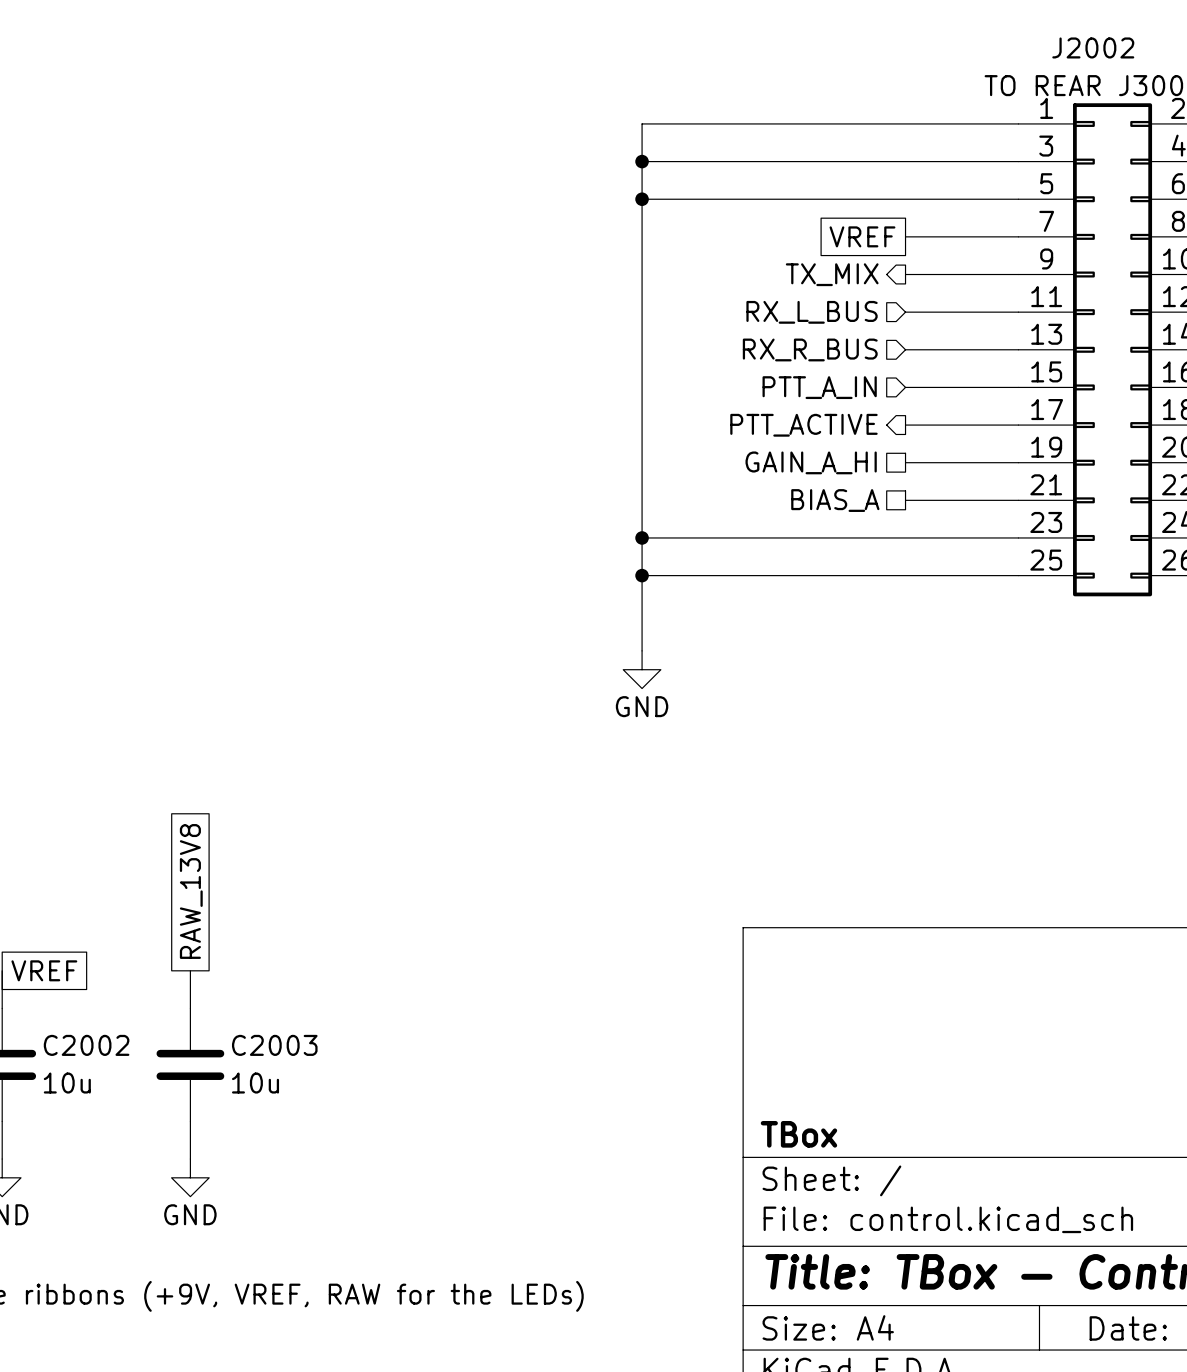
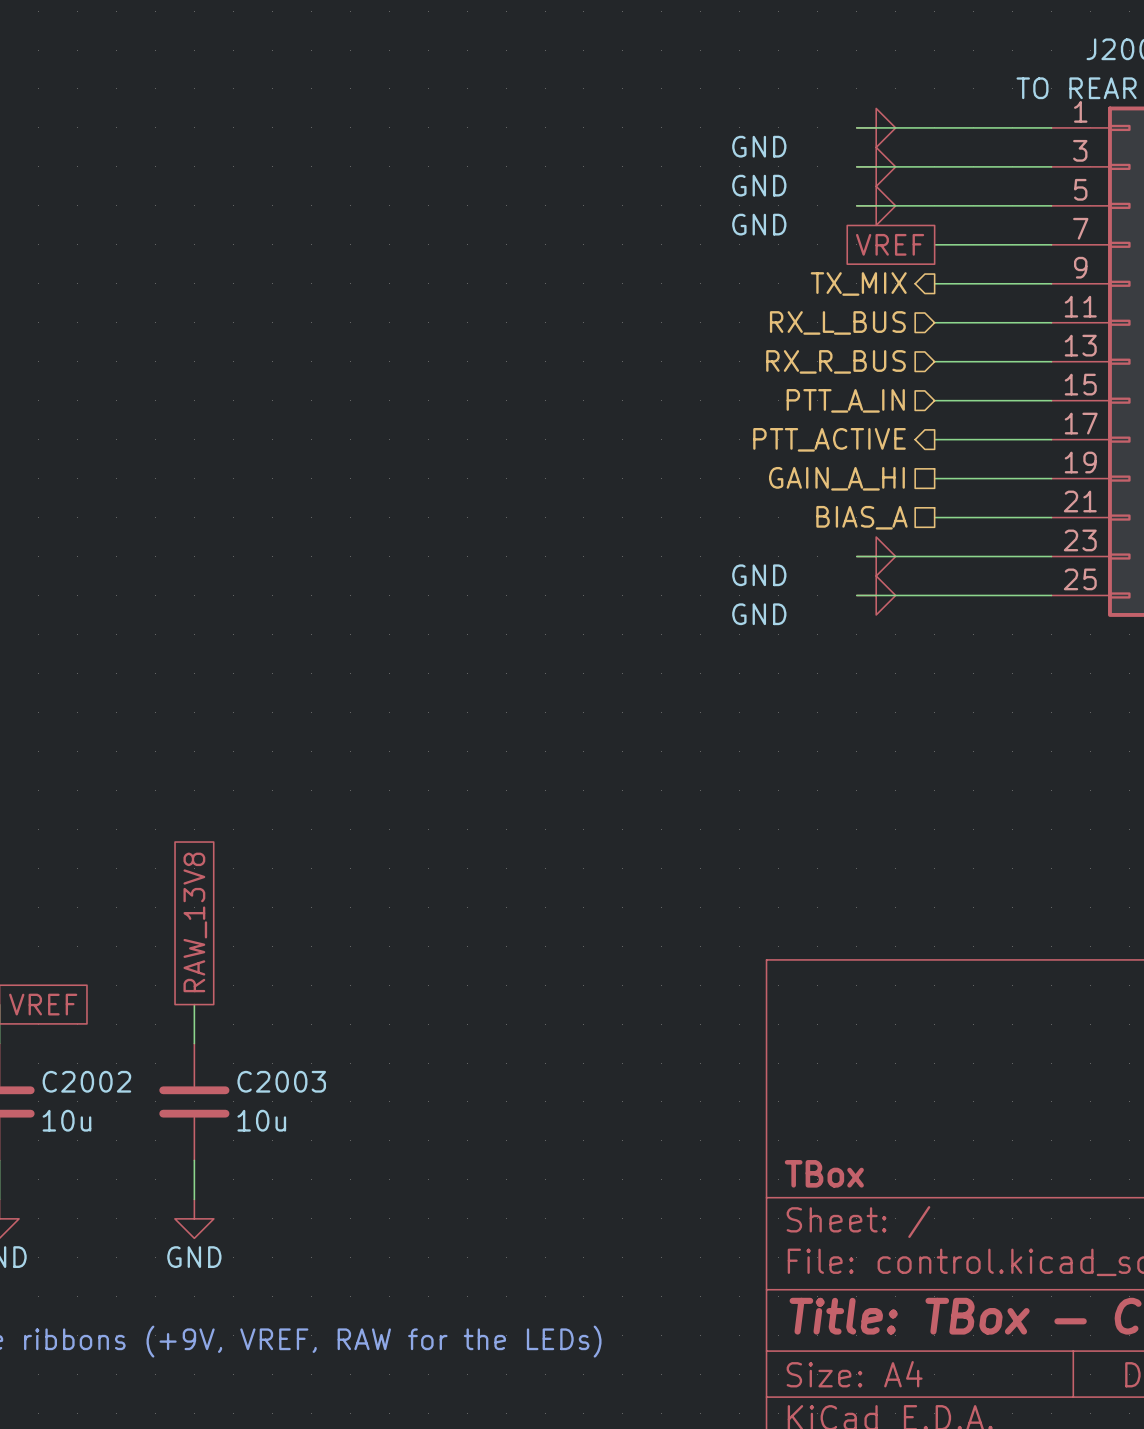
wire: (830, 123) (642, 123) (642, 650) -> none
power symbol: none -> GND (876, 127)
wire: (642, 161) (830, 161) -> none
junction: (642, 161) -> none
power symbol: none -> GND (876, 166)
wire: (642, 199) (830, 199) -> none
junction: (642, 199) -> none
power symbol: none -> GND (876, 205)
wire: (642, 537) (830, 537) -> none
junction: (642, 537) -> none
power symbol: none -> GND (876, 556)
wire: (642, 575) (830, 575) -> none
junction: (642, 575) -> none
power symbol: none -> GND (876, 595)
power symbol: GND (642, 669) -> none

